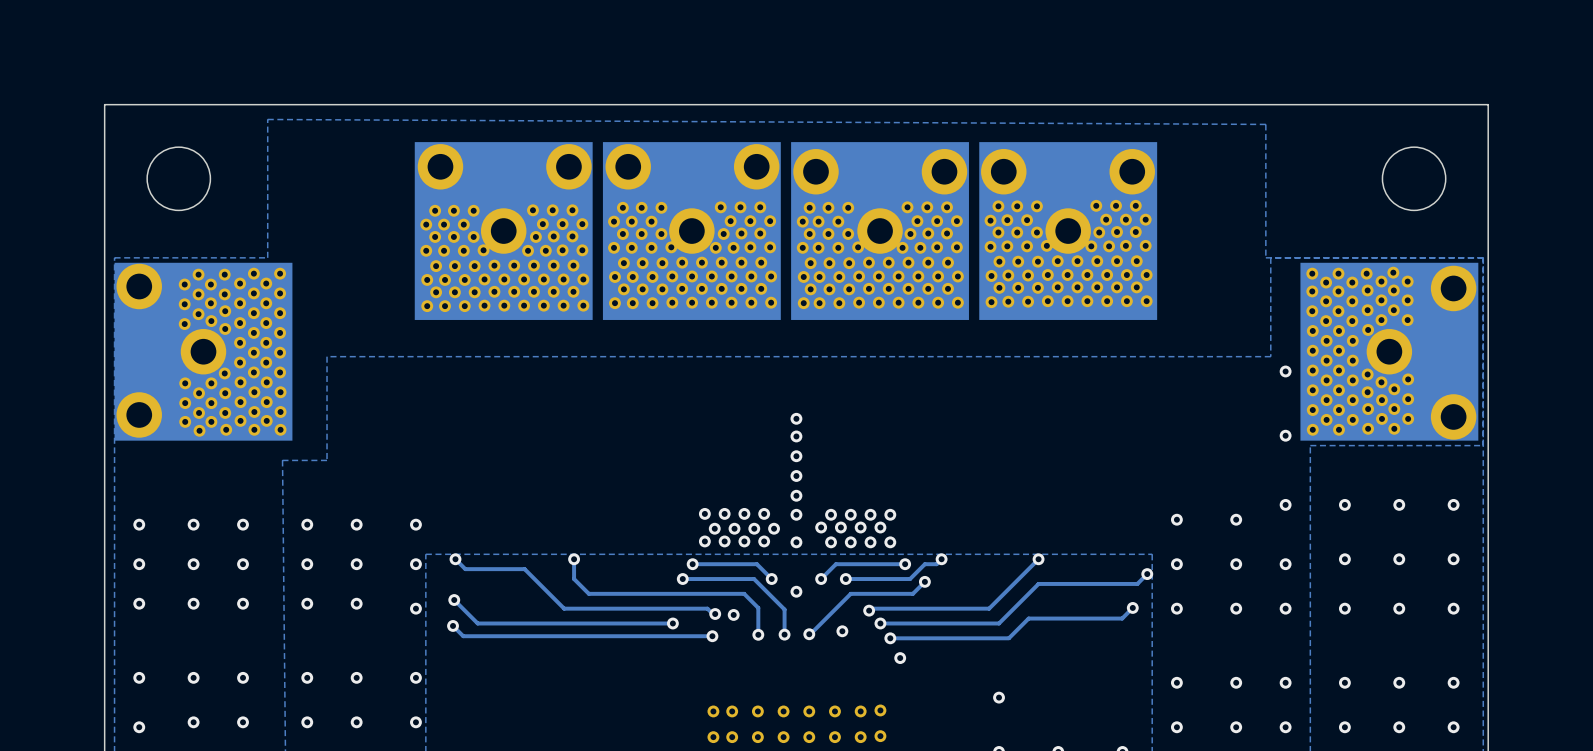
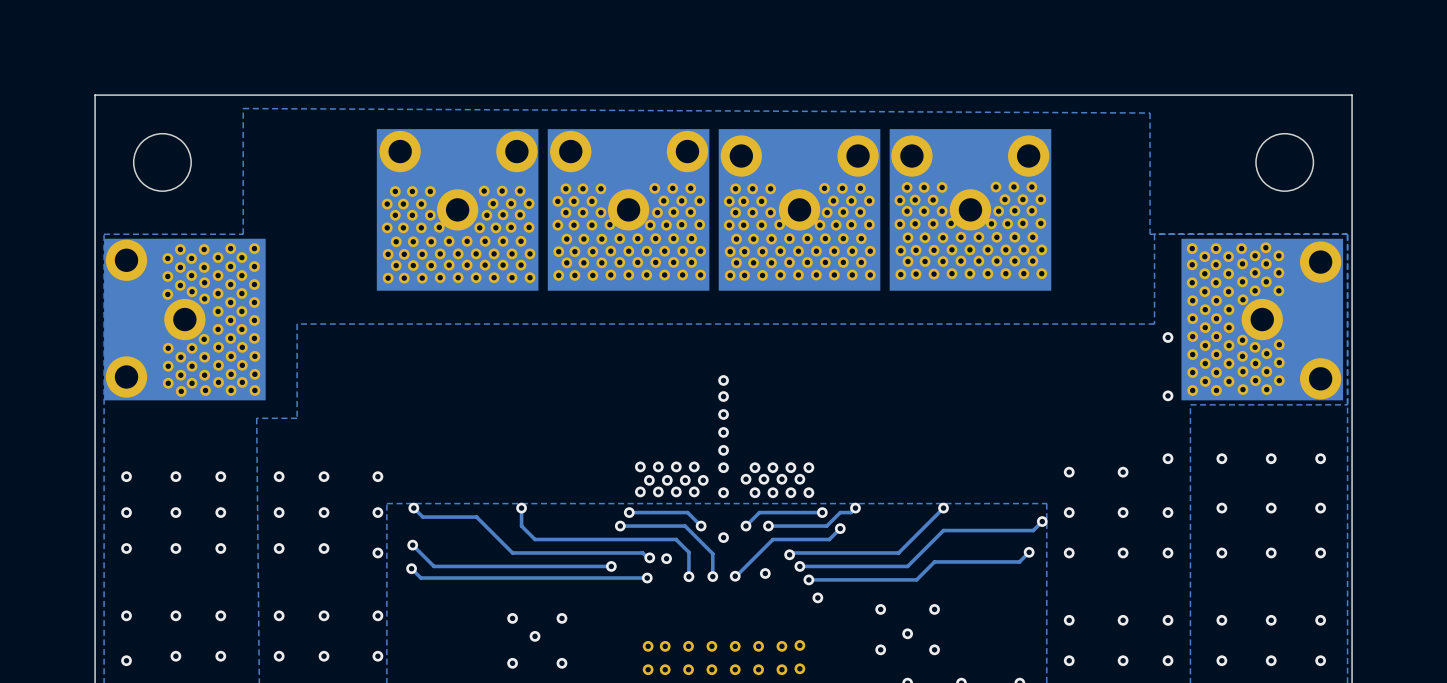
via: none -> (880, 609)
via: none -> (934, 609)
via: none -> (512, 618)
via: none -> (561, 618)
via: none -> (535, 636)
via: none -> (880, 649)
via: none -> (934, 649)
via: none -> (512, 663)
via: none -> (561, 663)

